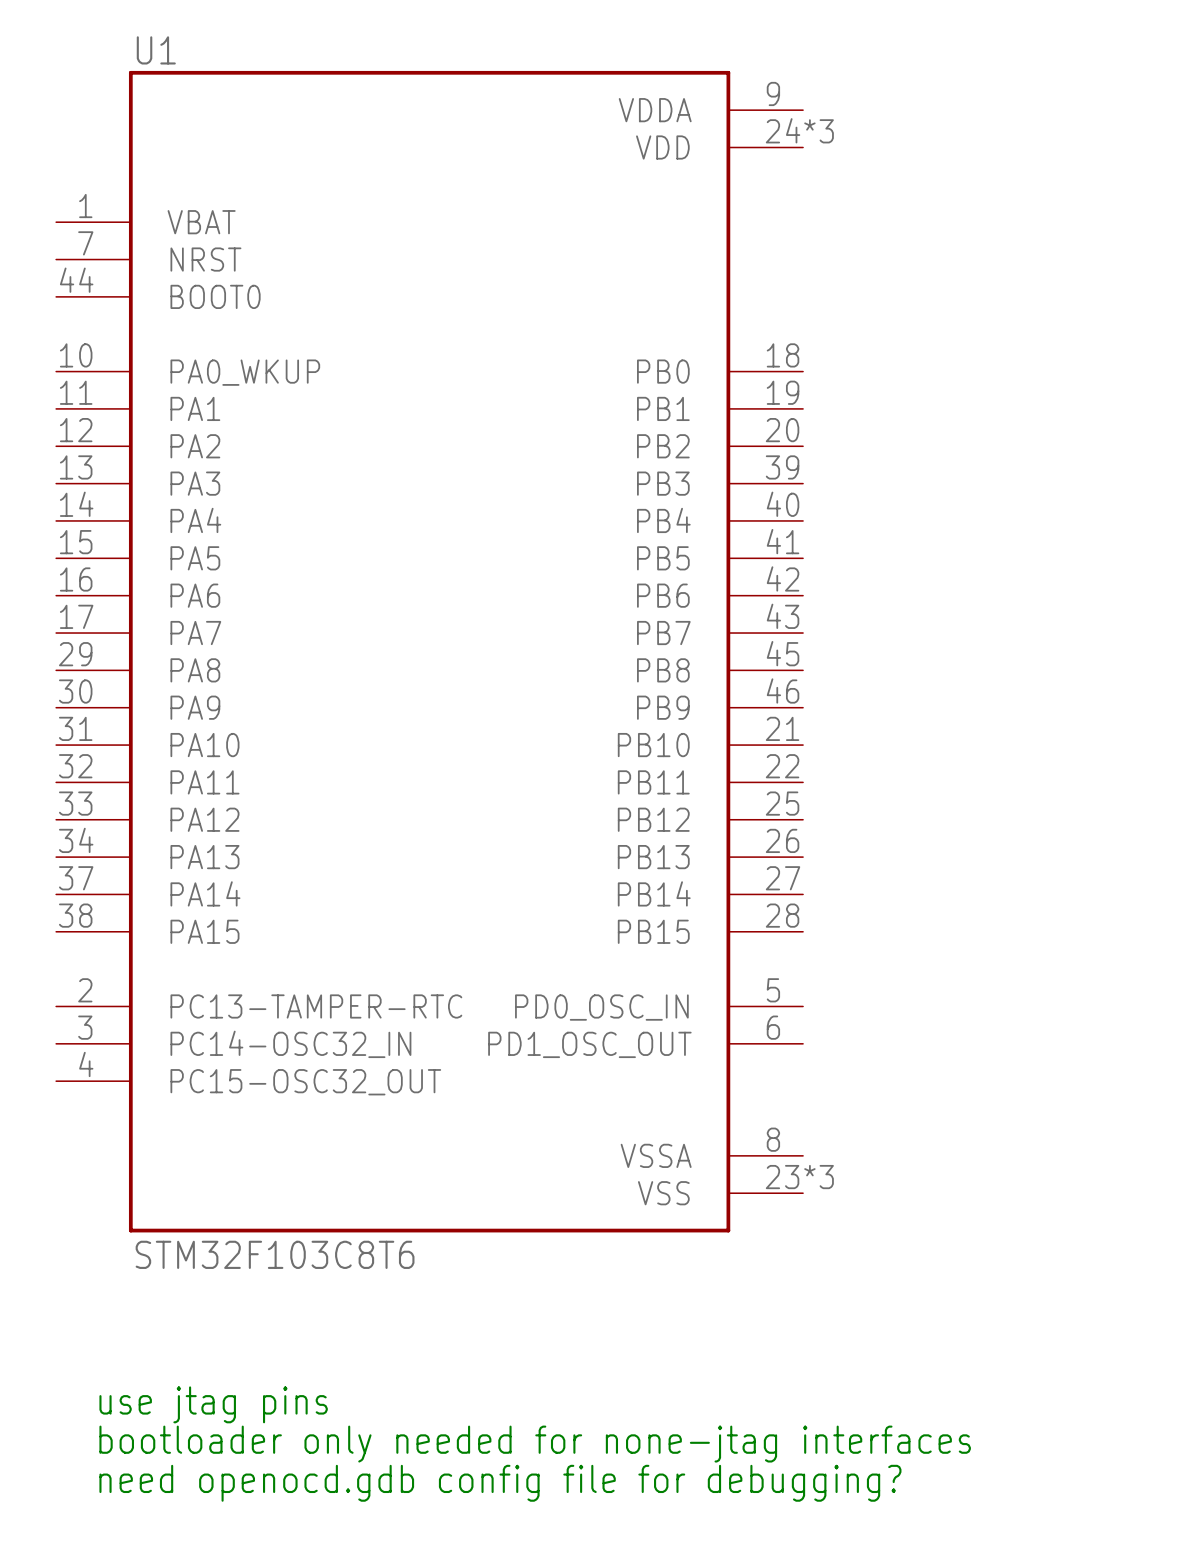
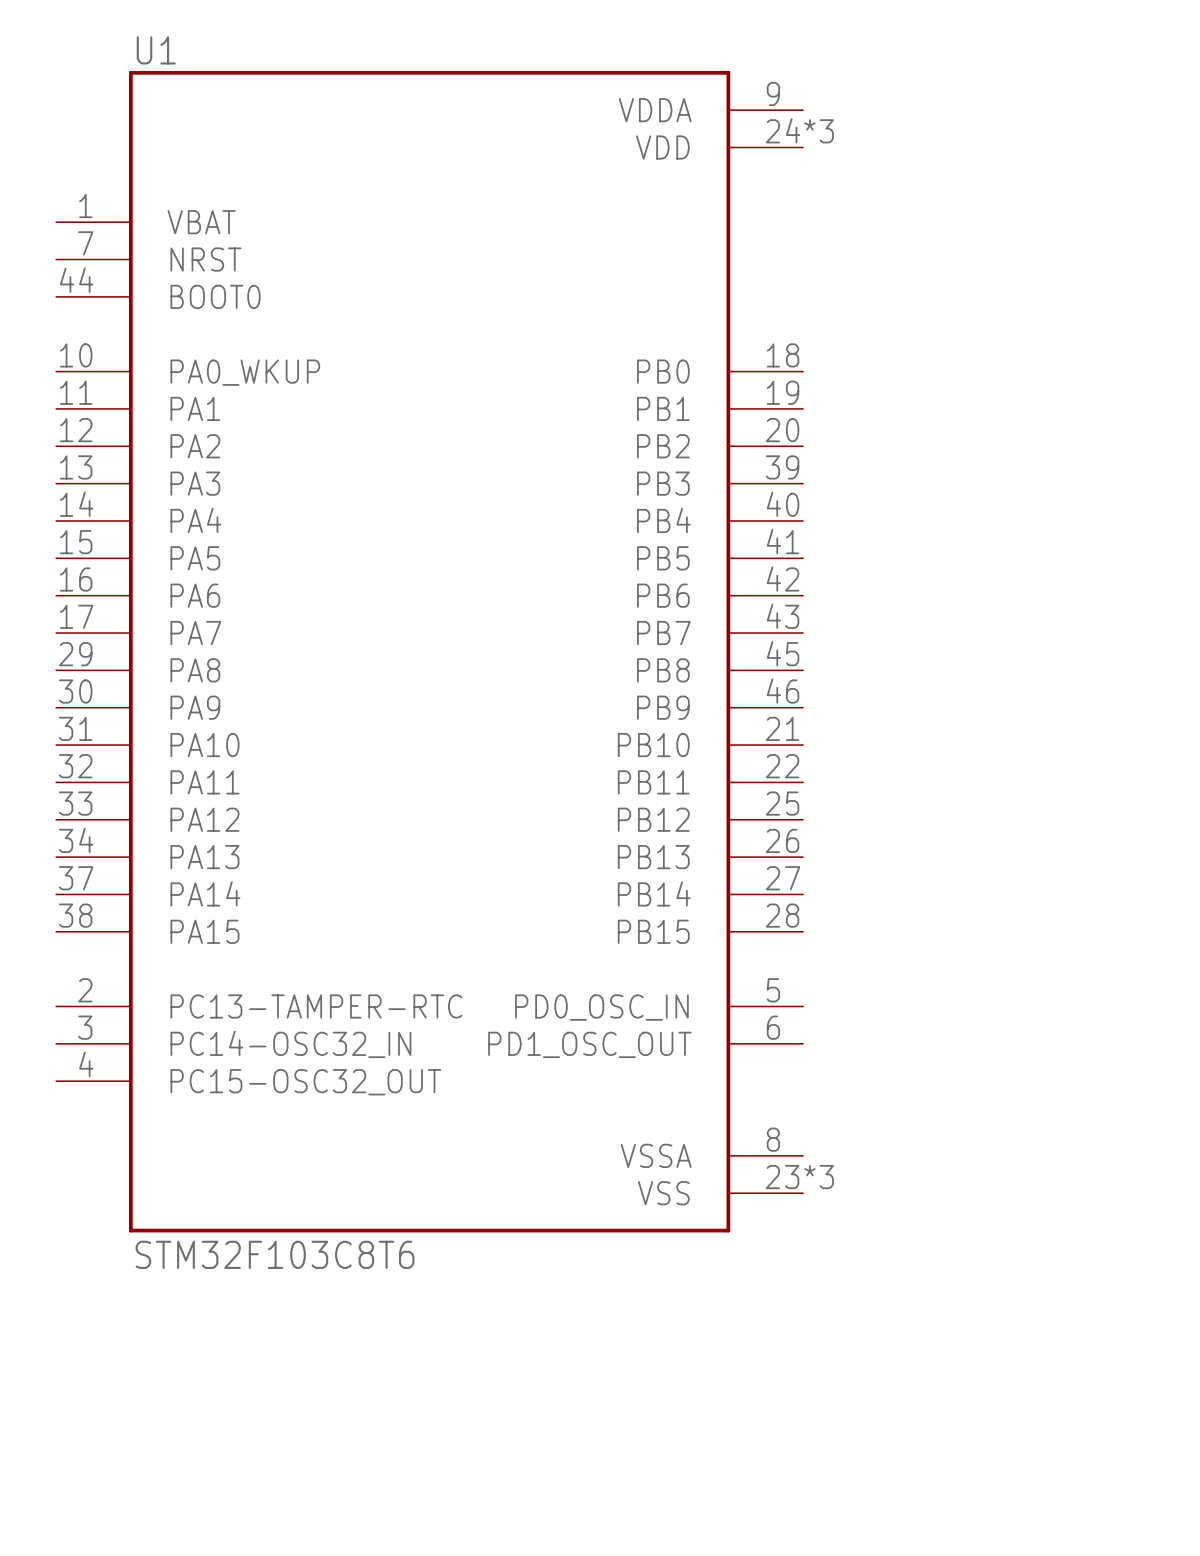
text: use jtag pins (213, 1404) -> none
text: bootloader only needed for none-jtag interfaces (535, 1444) -> none
text: need openocd.gdb config file for debugging? (500, 1483) -> none

